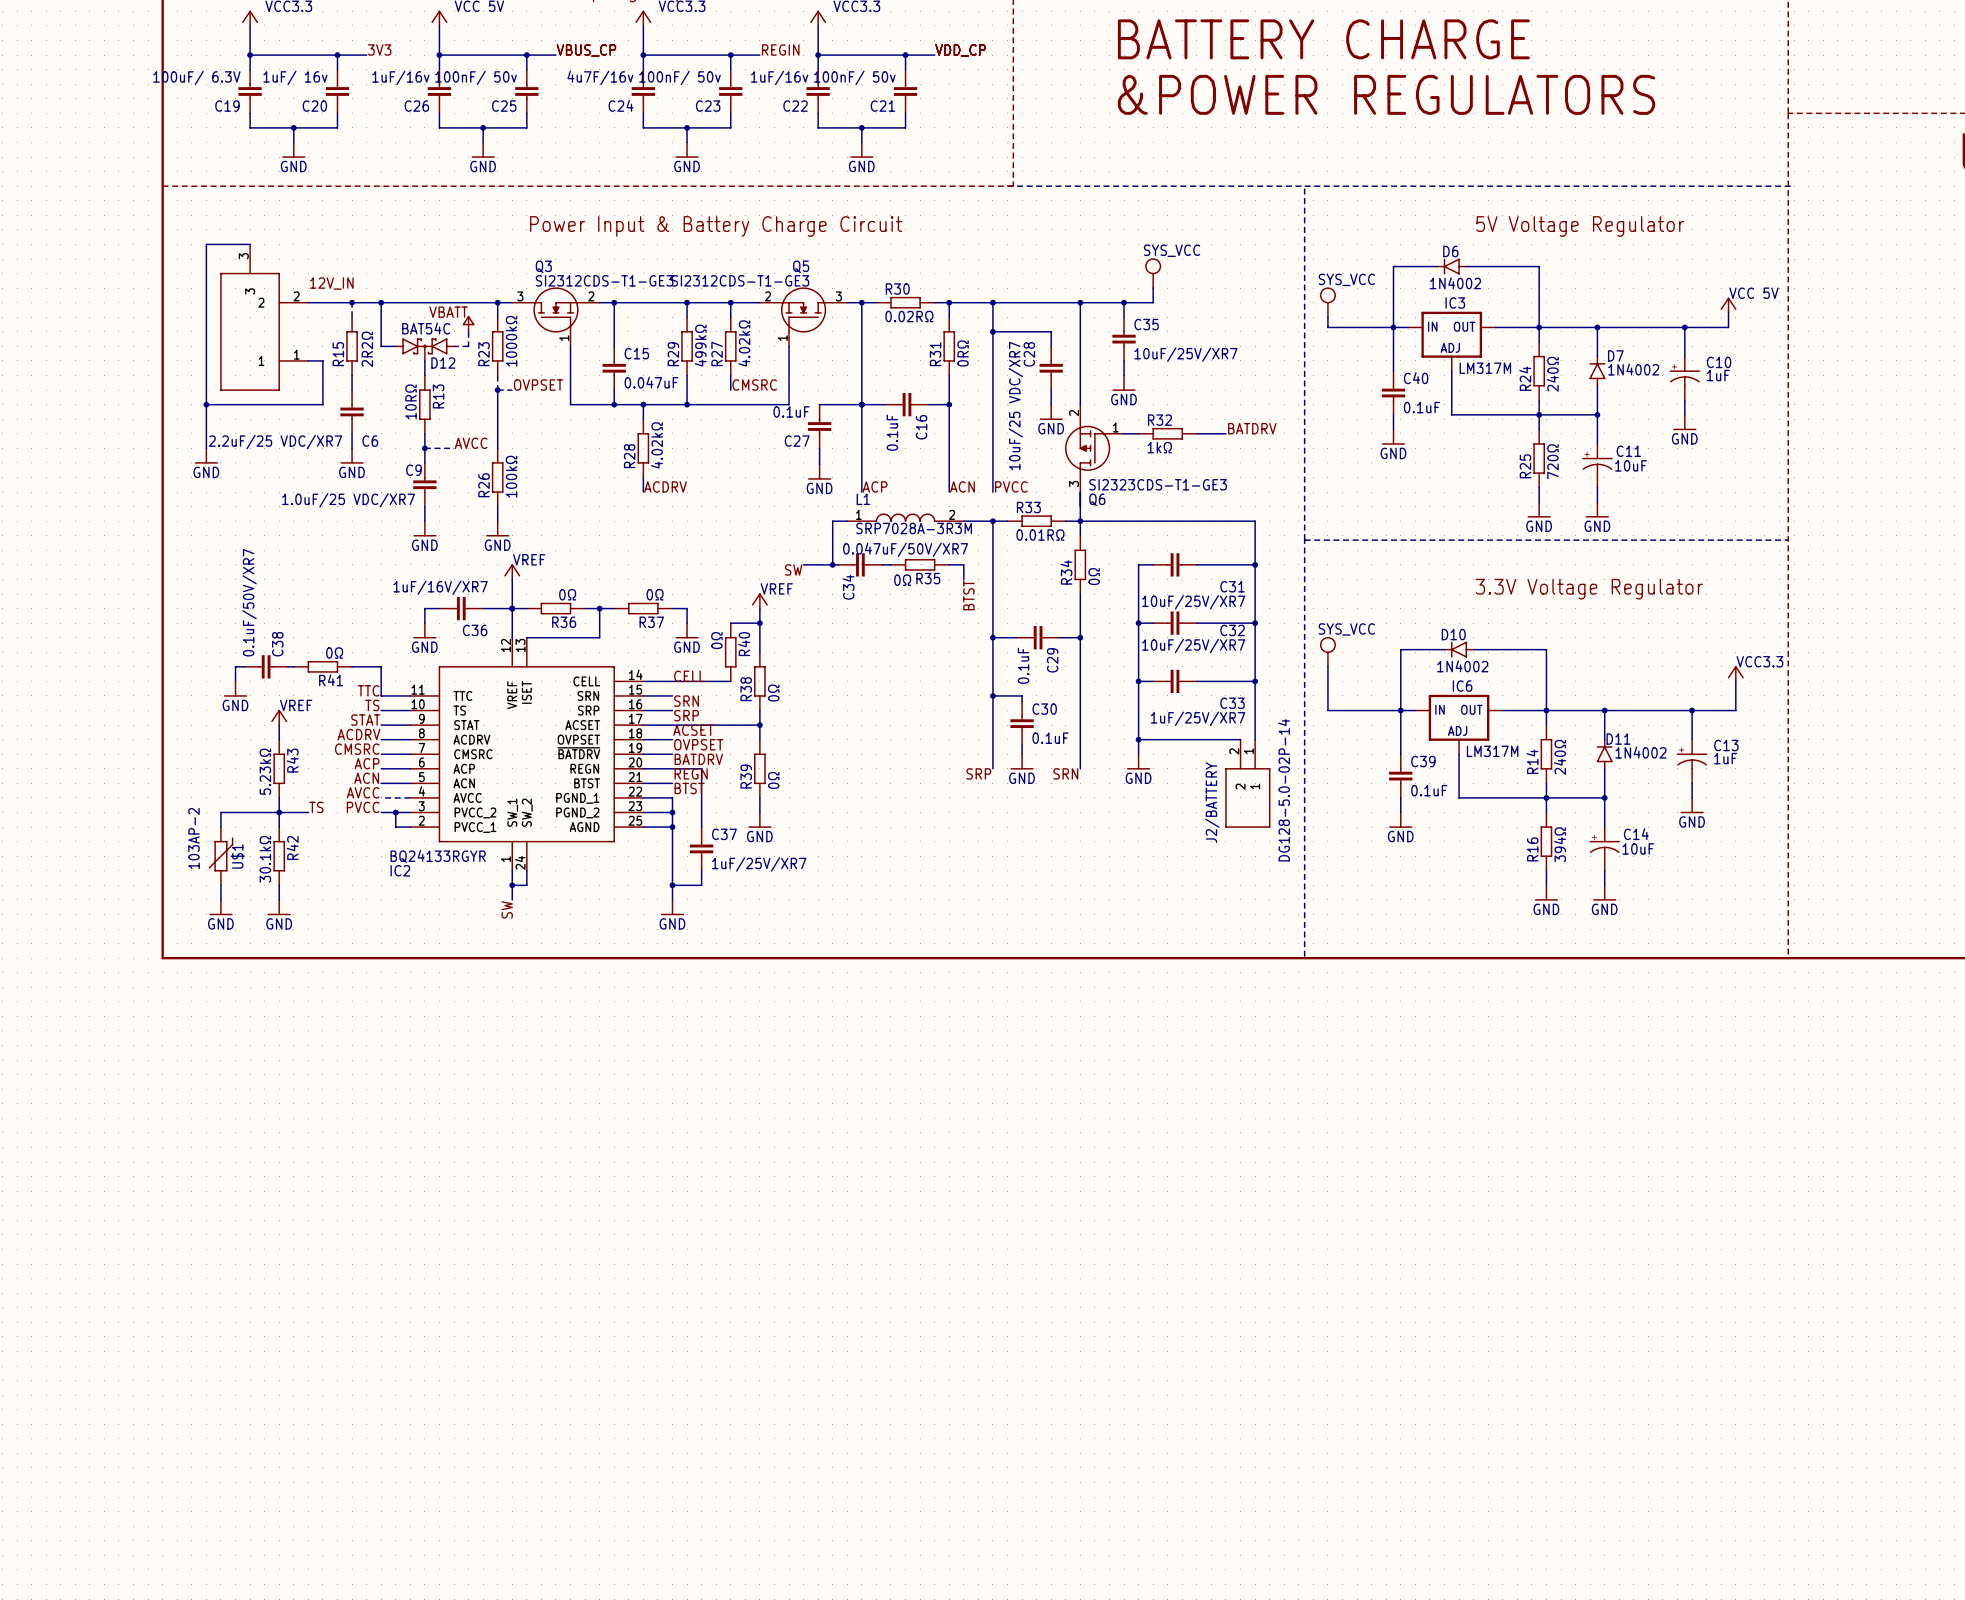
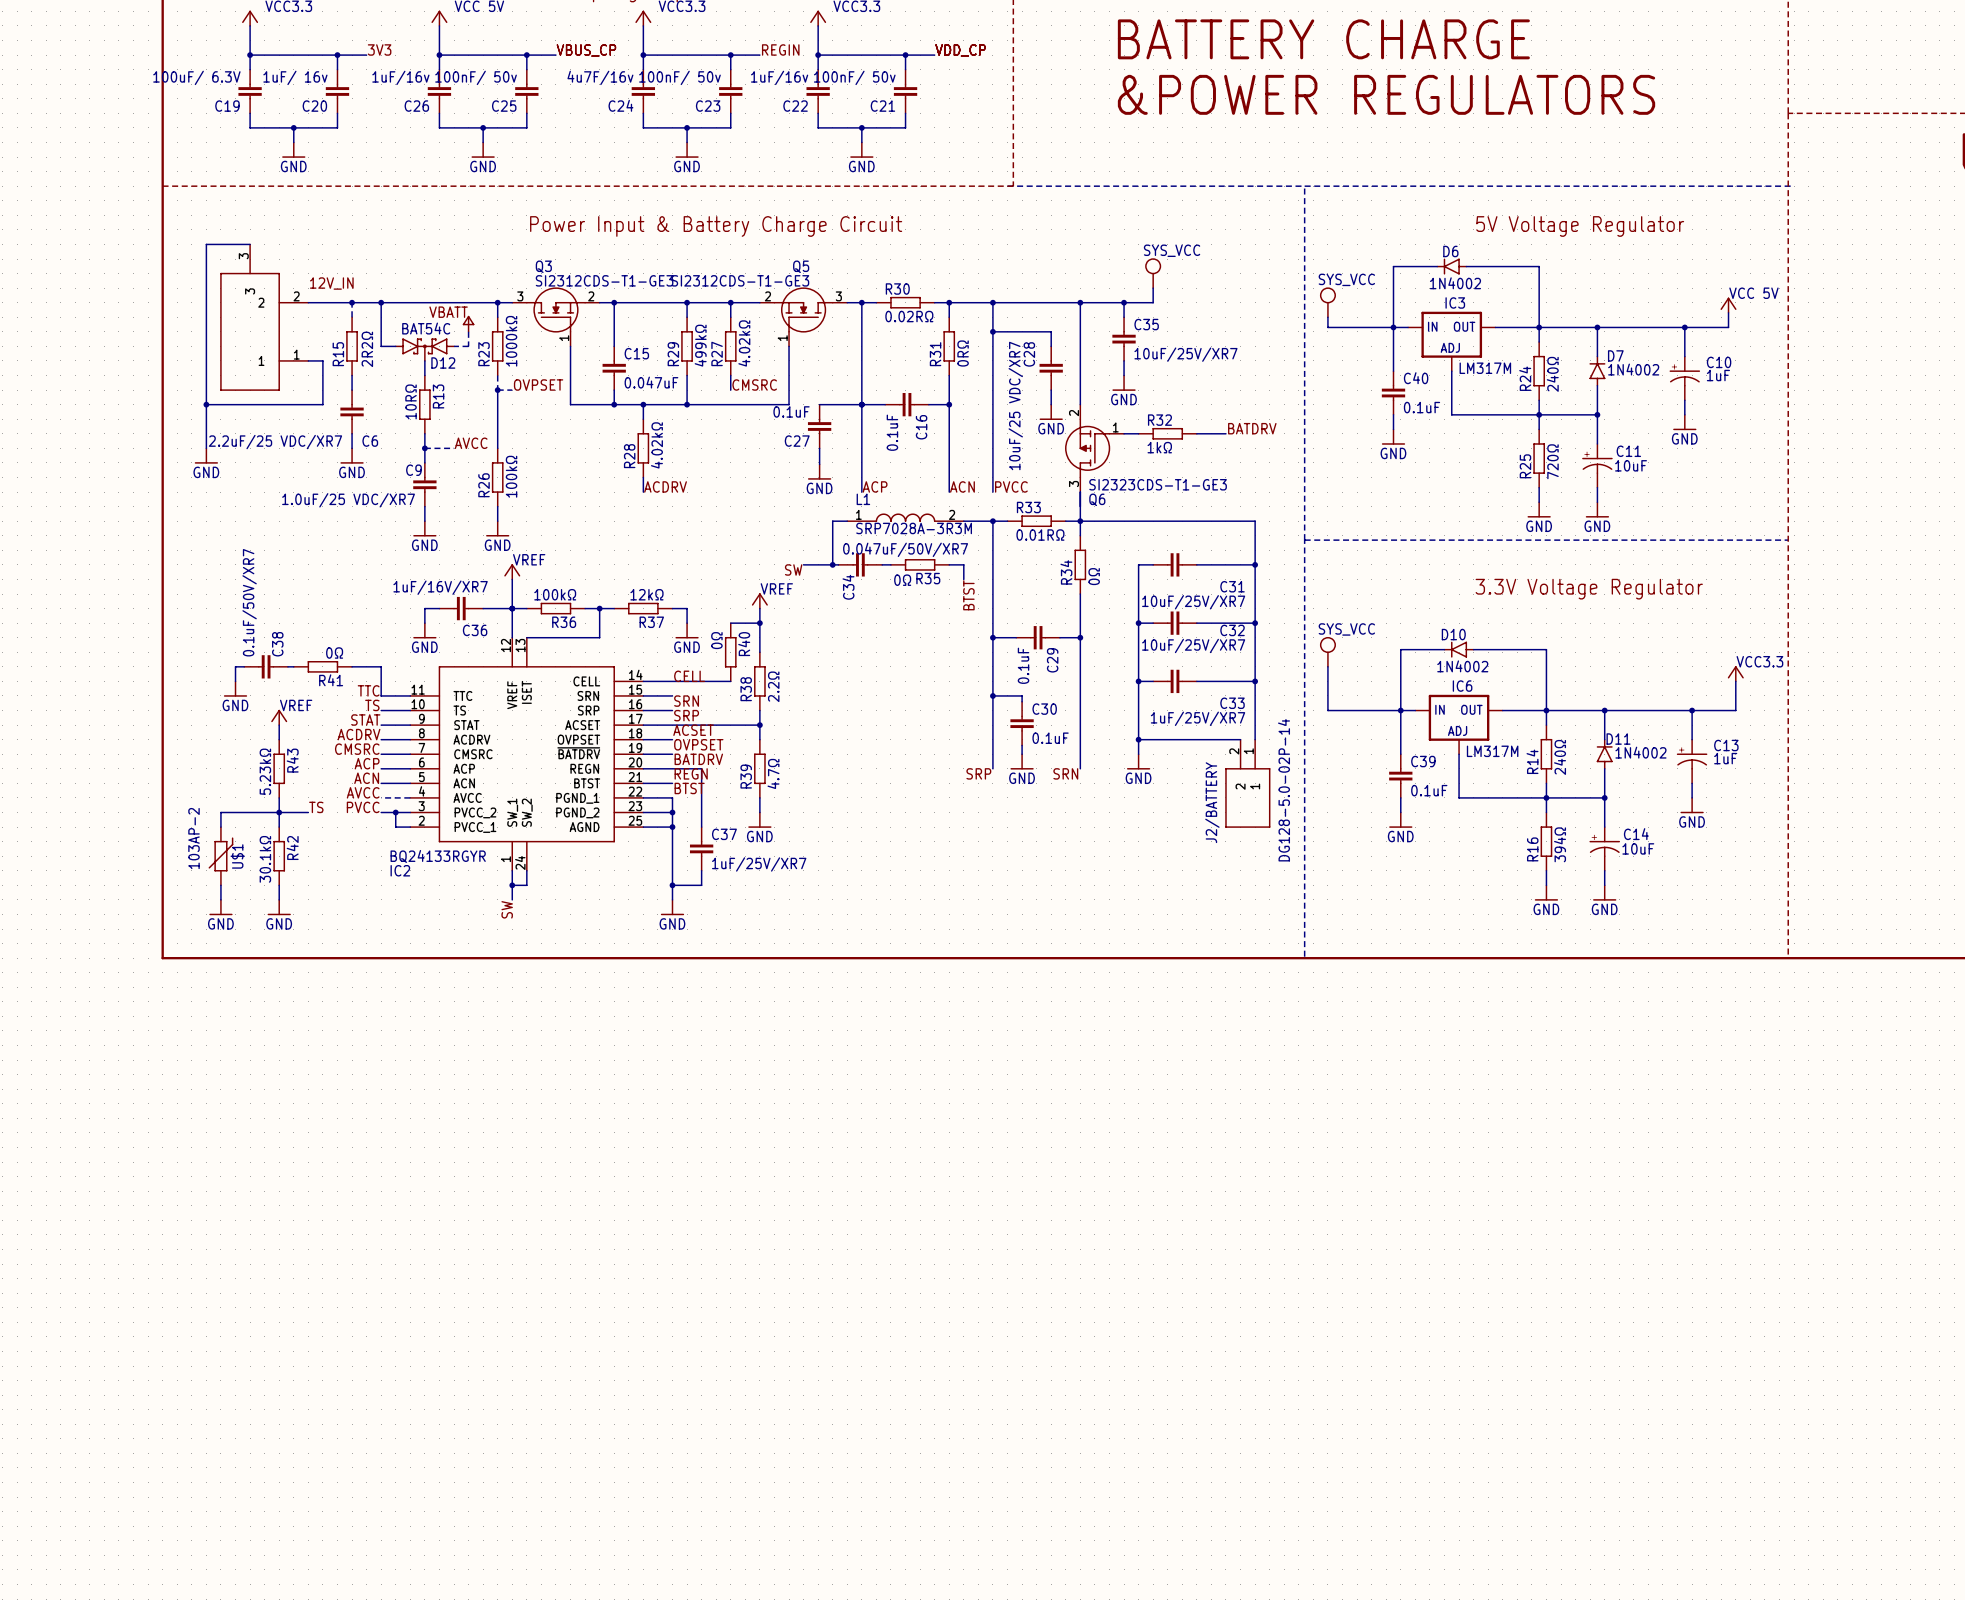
R36 value: 0Ω (567, 594) -> 100kΩ (555, 594)
R37 value: 0Ω (655, 594) -> 12kΩ (646, 594)
R38 value: 0Ω (773, 693) -> 2.2Ω (773, 686)
R39 value: 0Ω (773, 780) -> 4.7Ω (773, 773)

